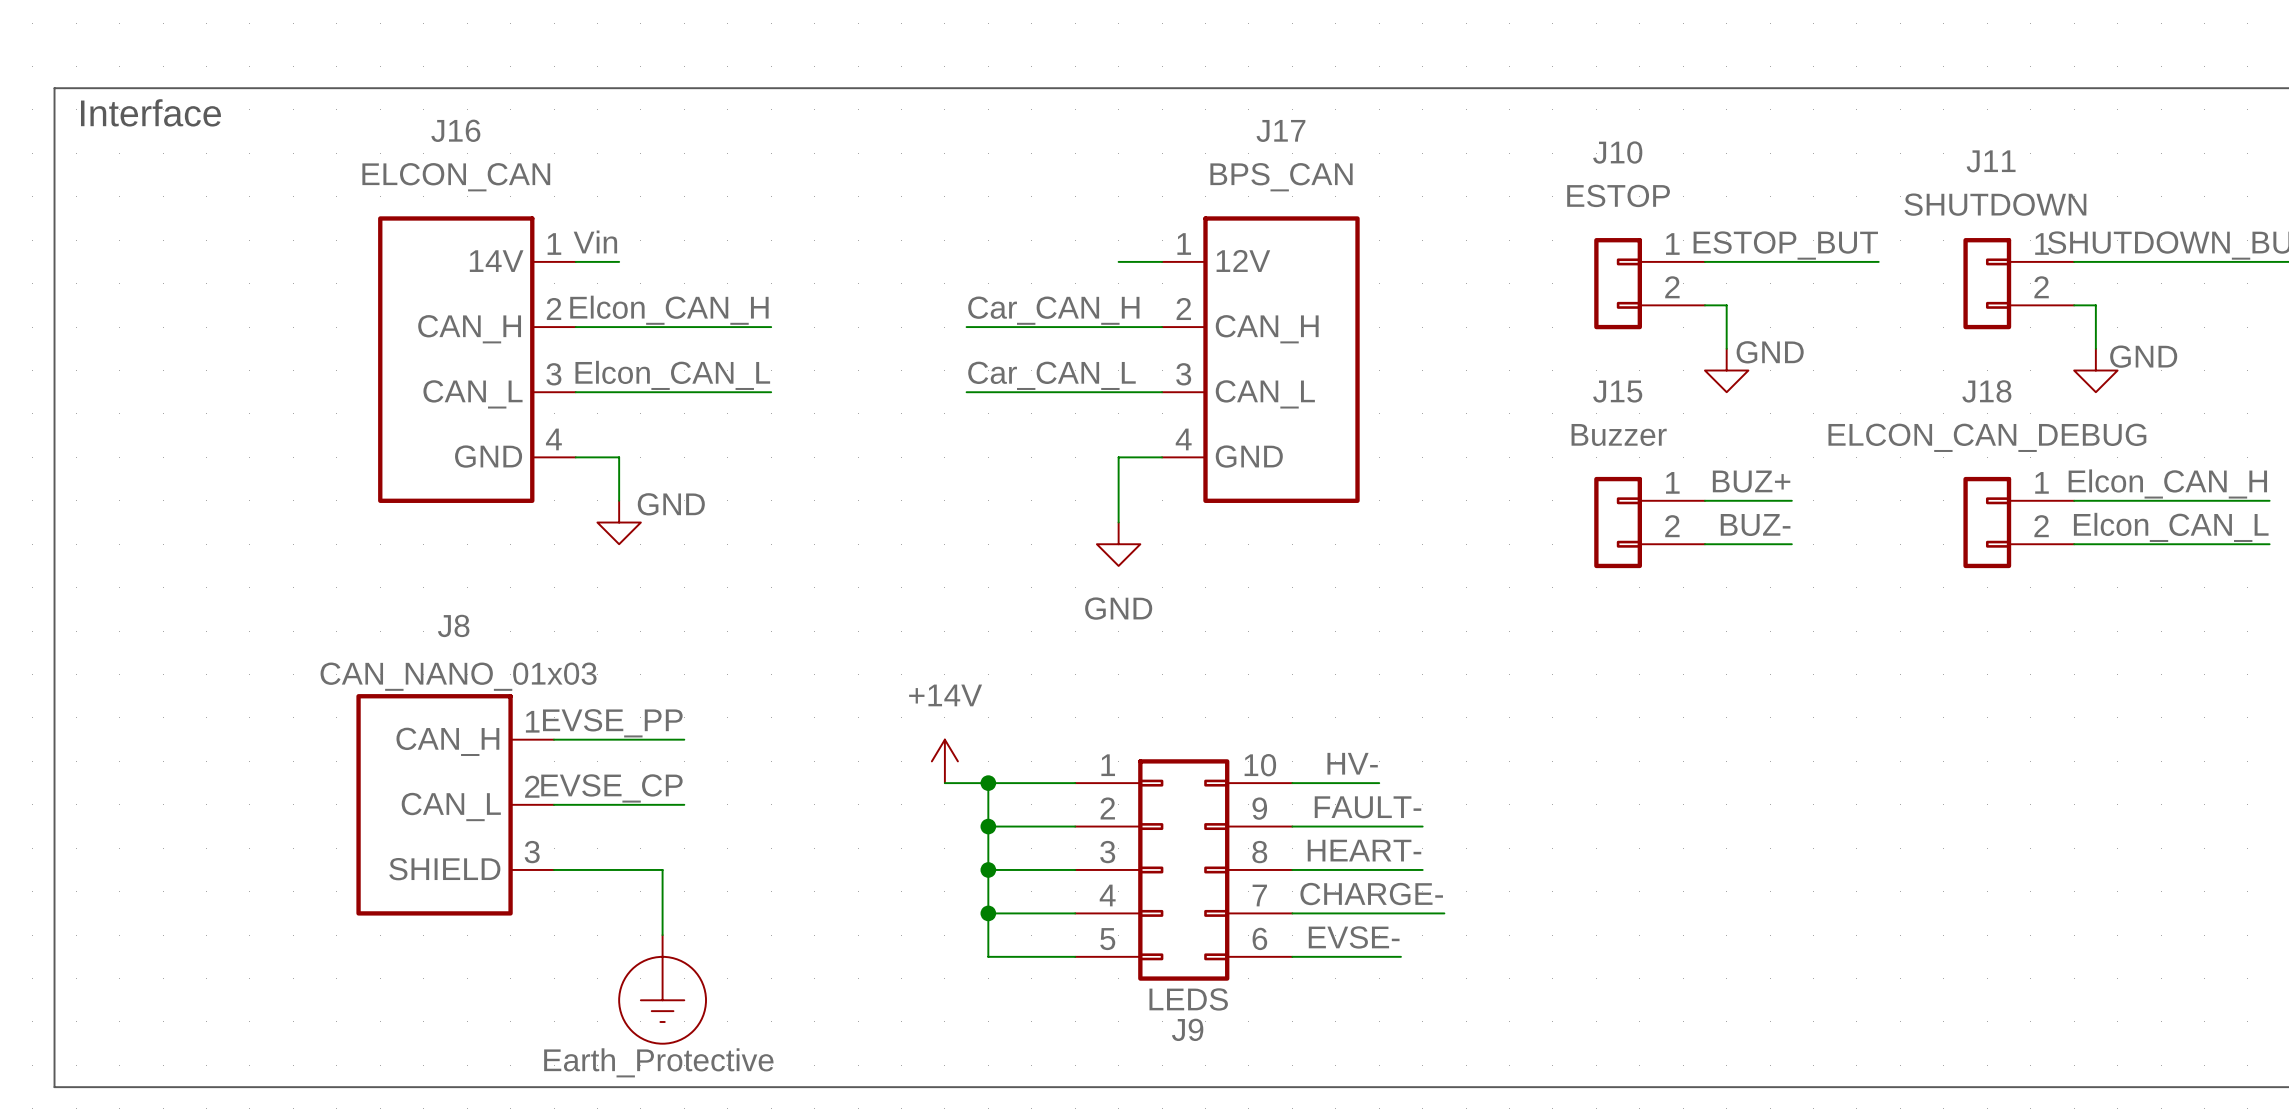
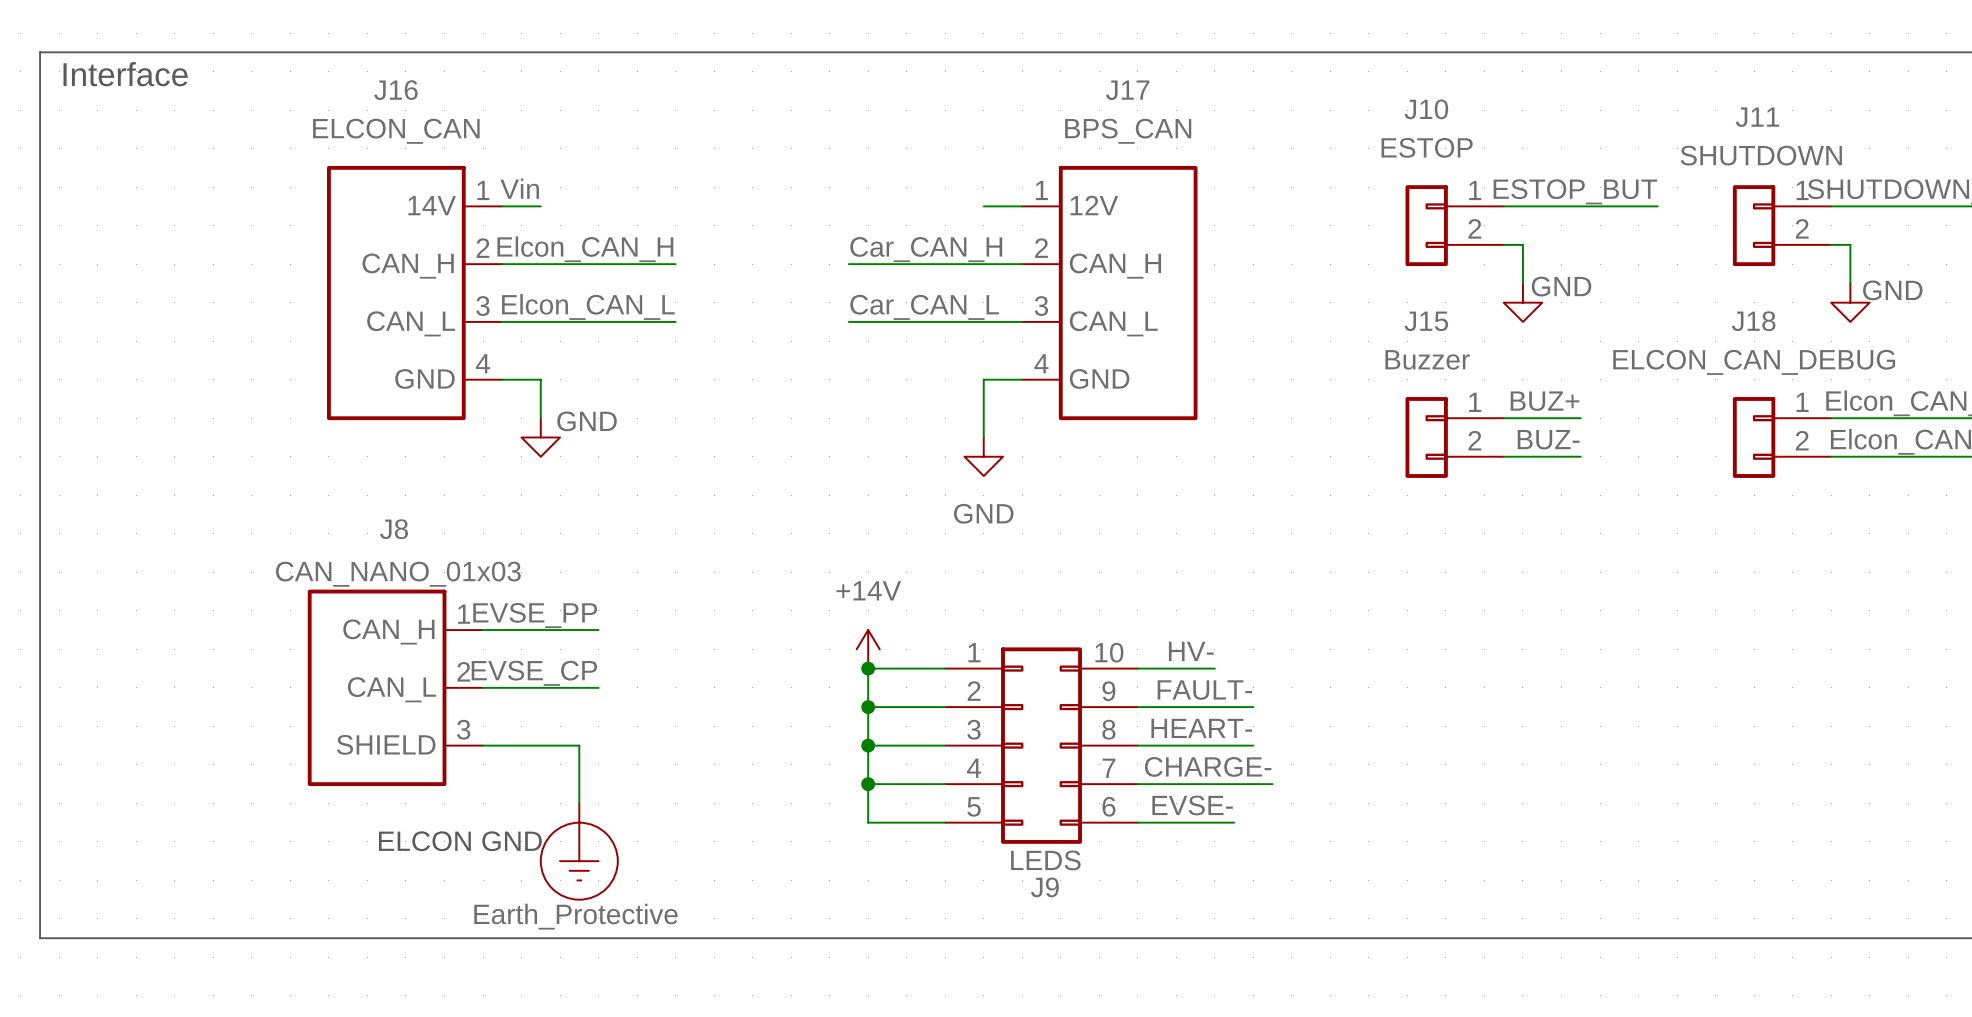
power symbol position: +14V (944, 761) -> +14V (868, 649)
wire: (944, 783) (988, 783) -> none
text: none -> ELCON GND (460, 841)

